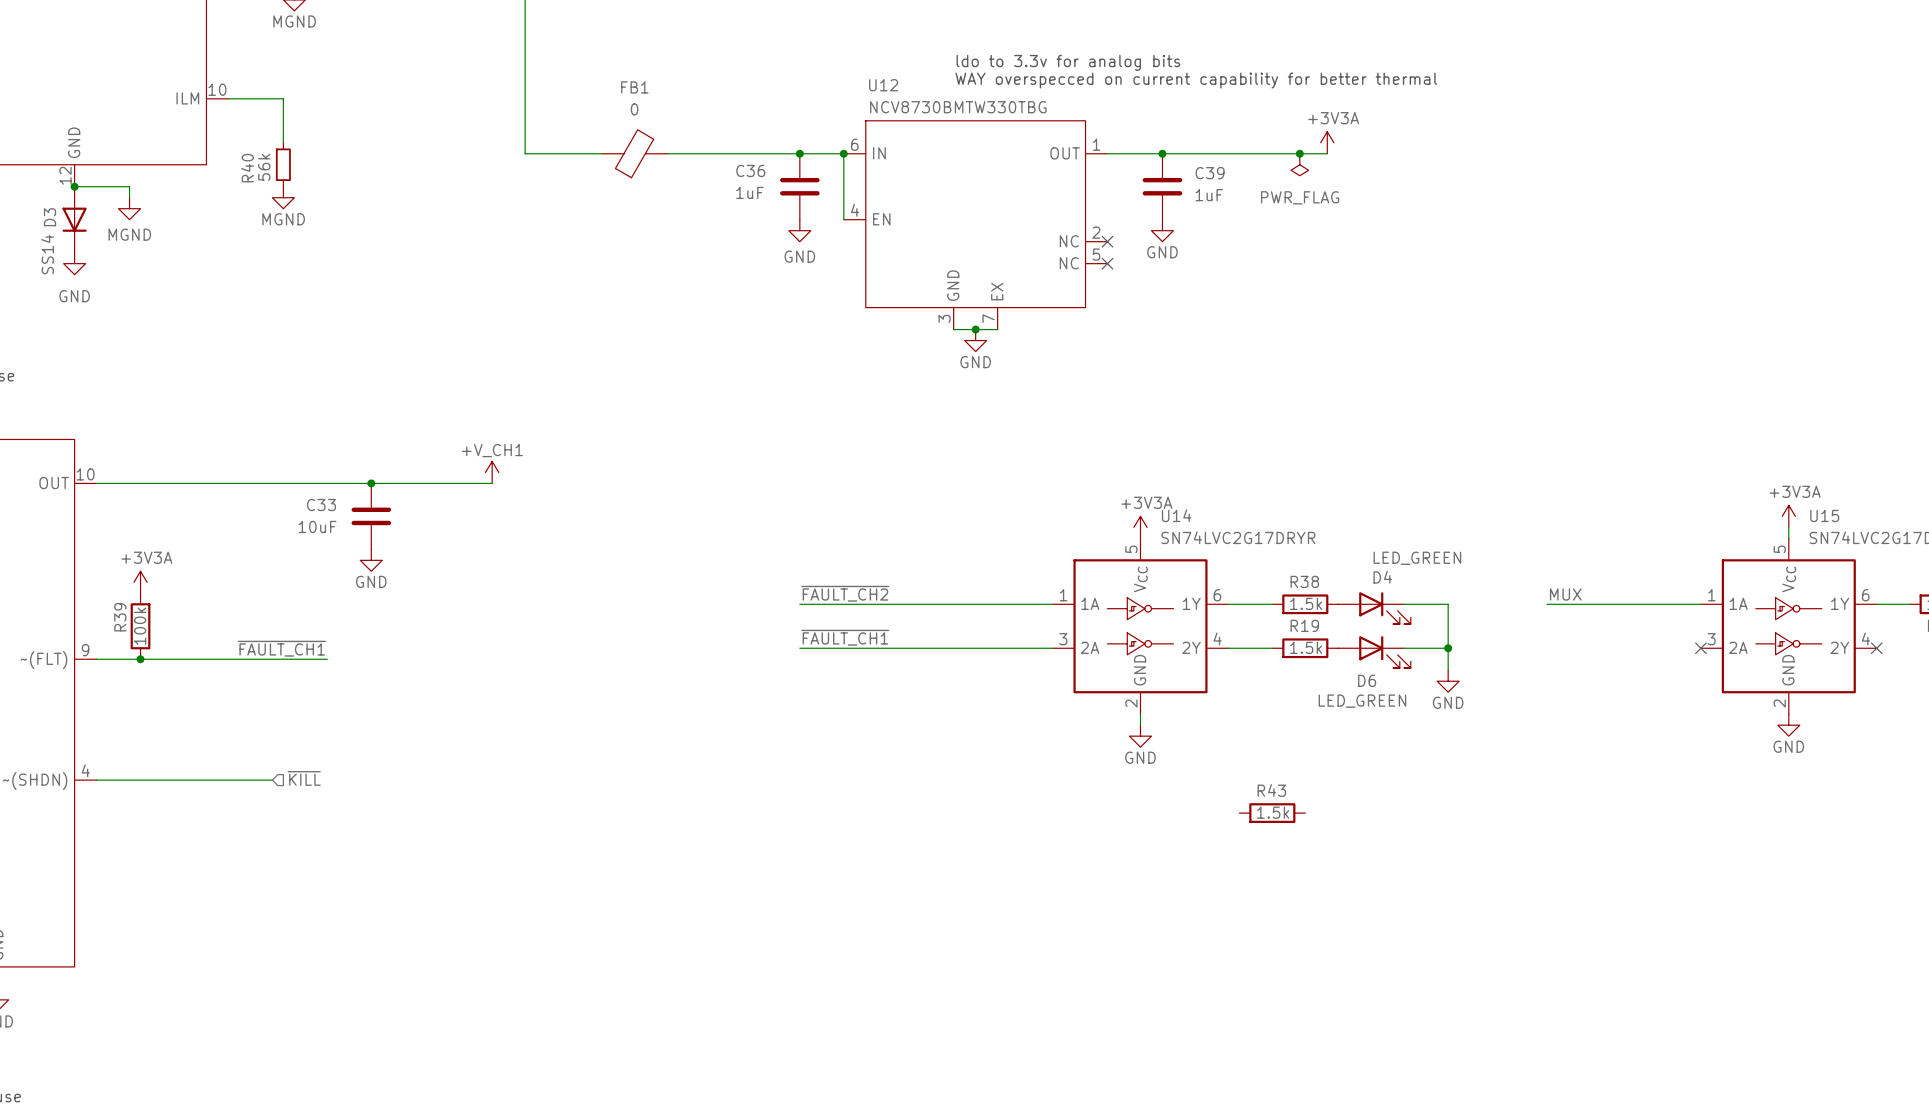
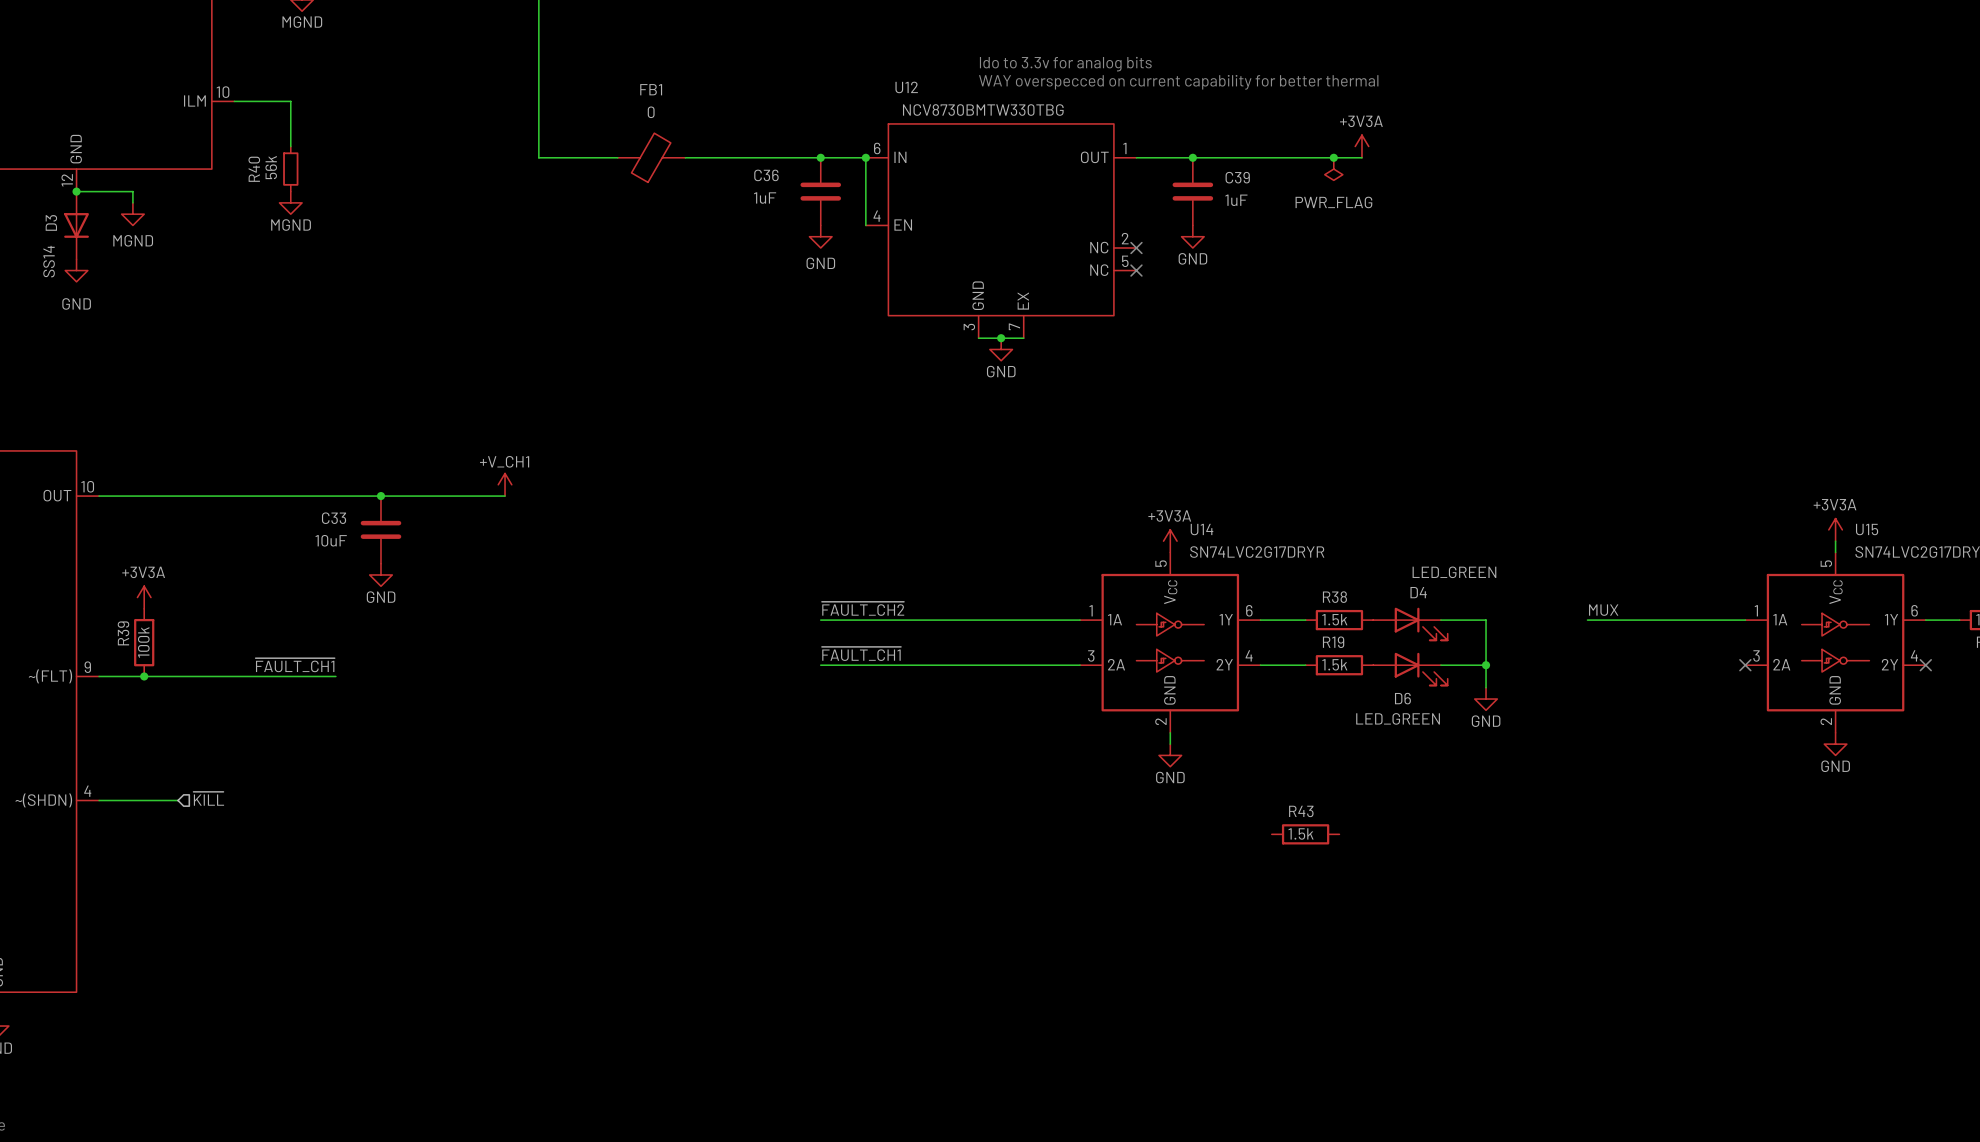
hierarchical label position: ~{KILL} (304, 778) -> ~{KILL} (208, 798)
wire: (173, 780) (272, 780) -> none

